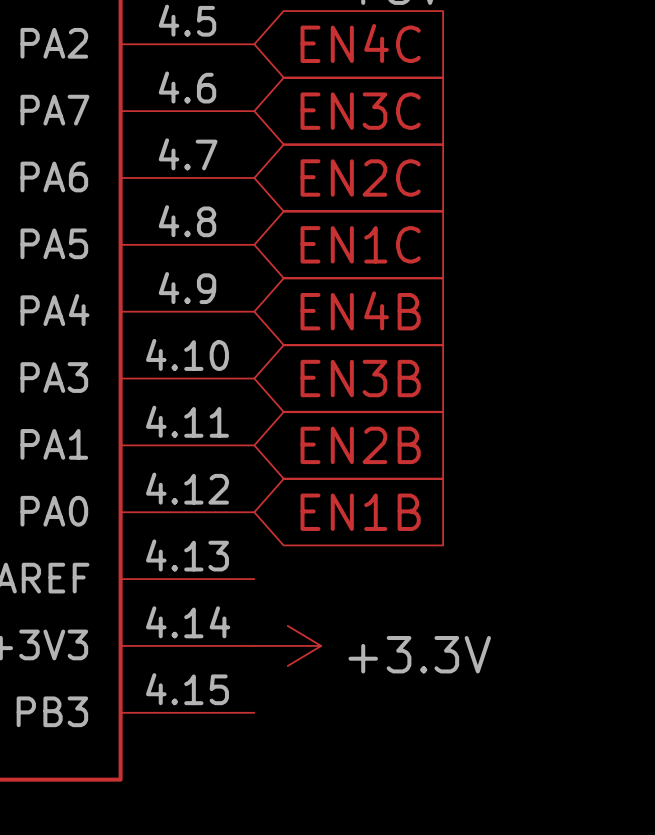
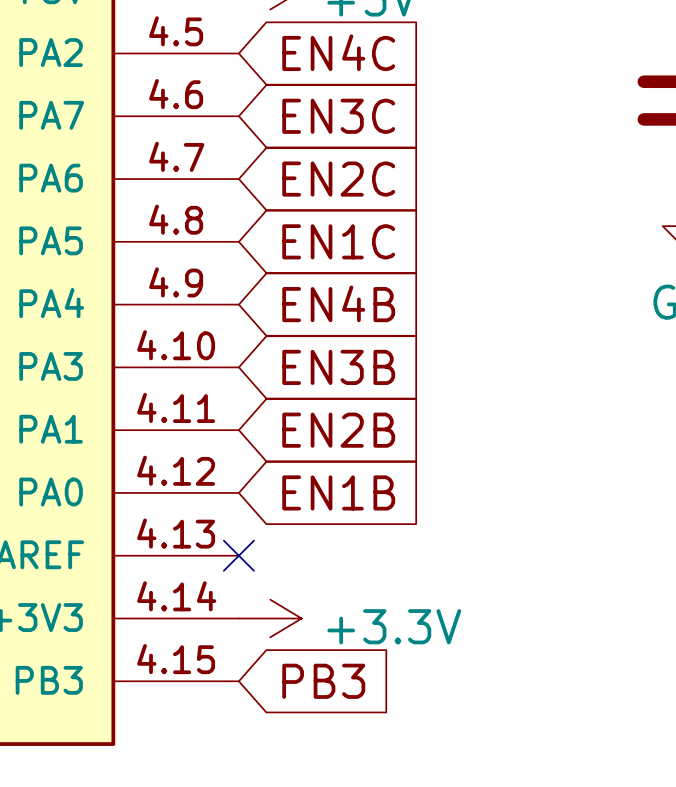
no-connect mark: none -> (238, 555)
global label: none -> PB3 (323, 681)

